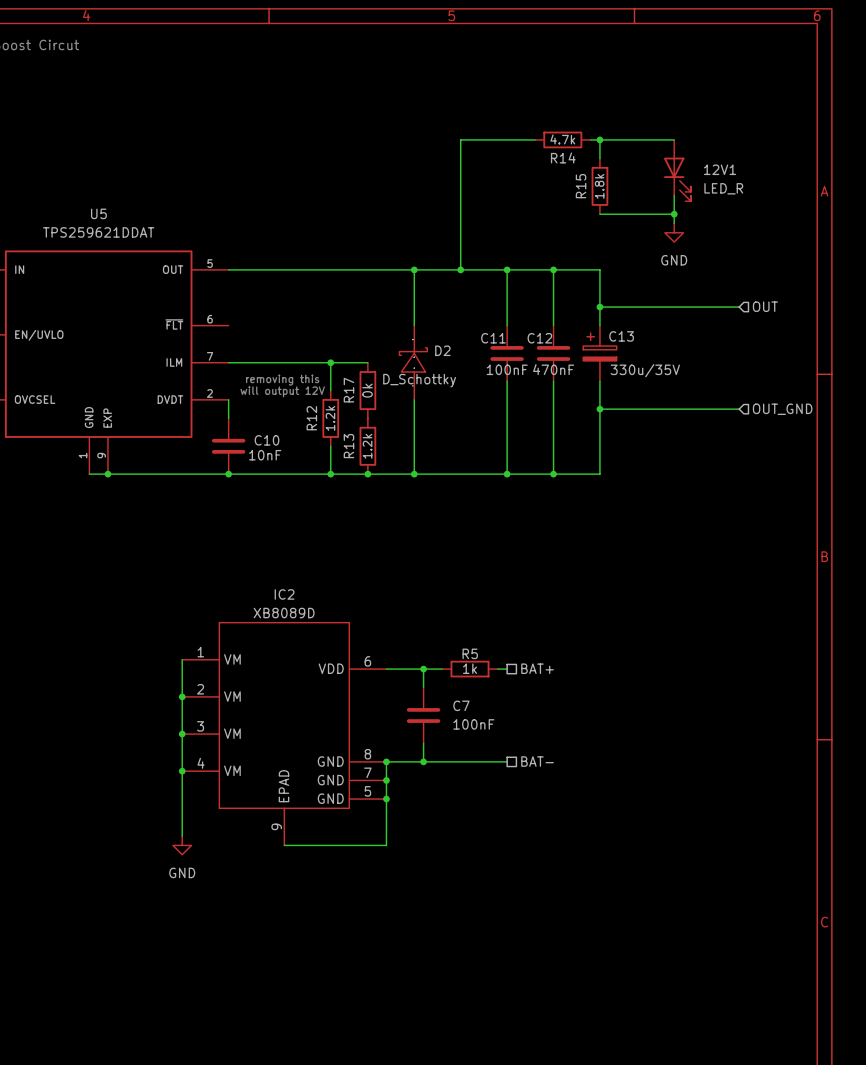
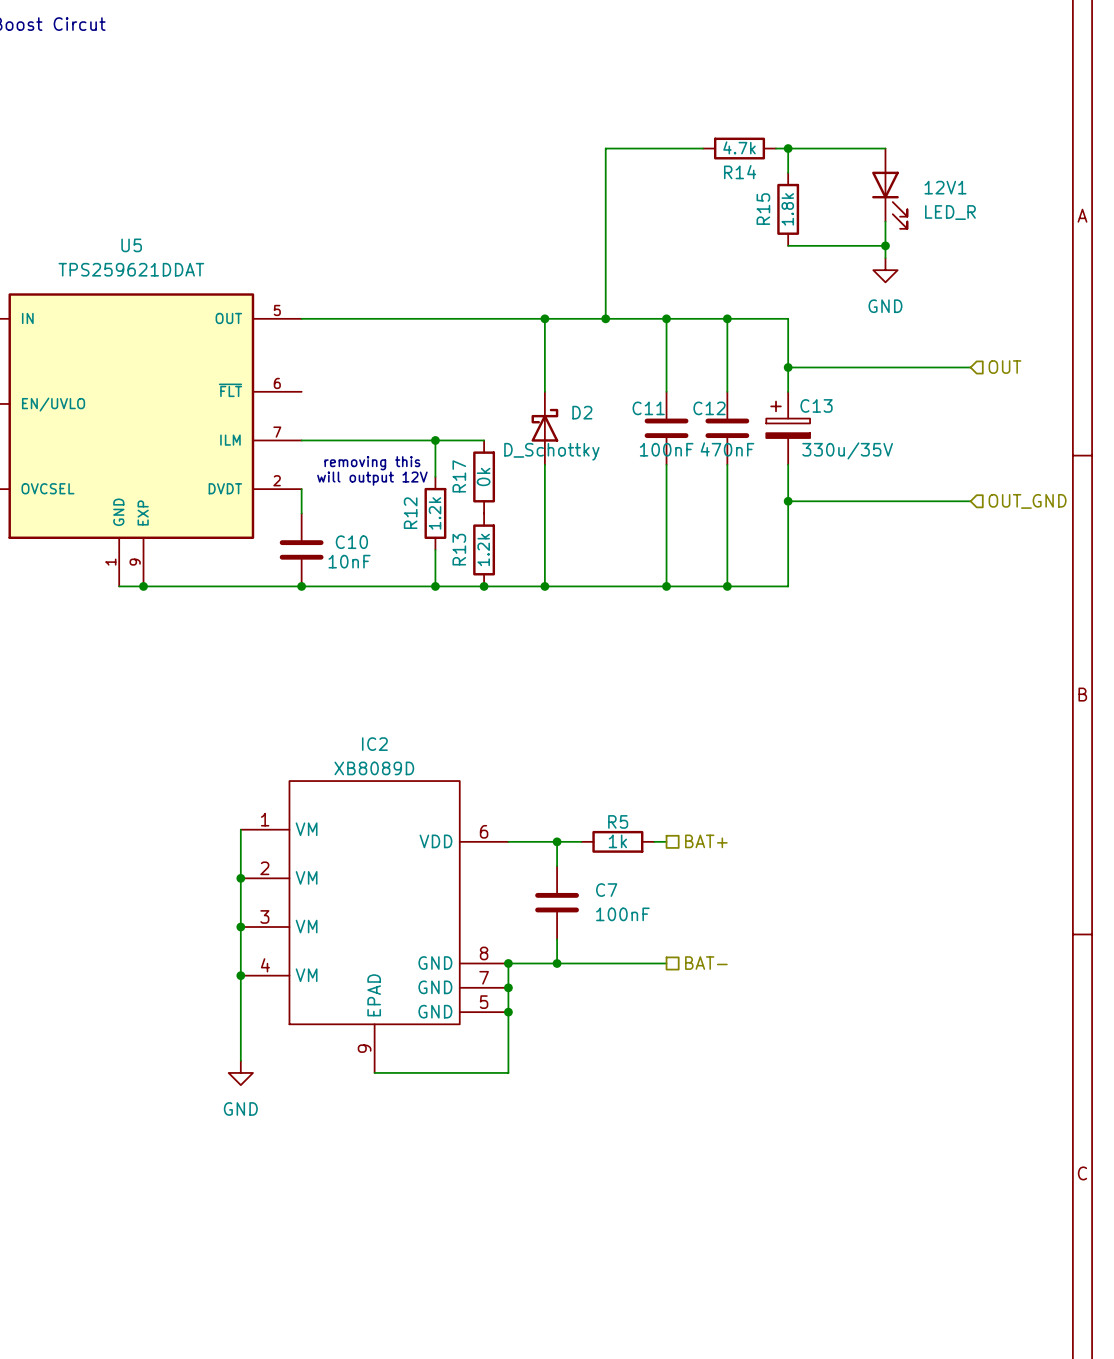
D2 symbol: [399, 325, 428, 400] -> [531, 391, 559, 465]

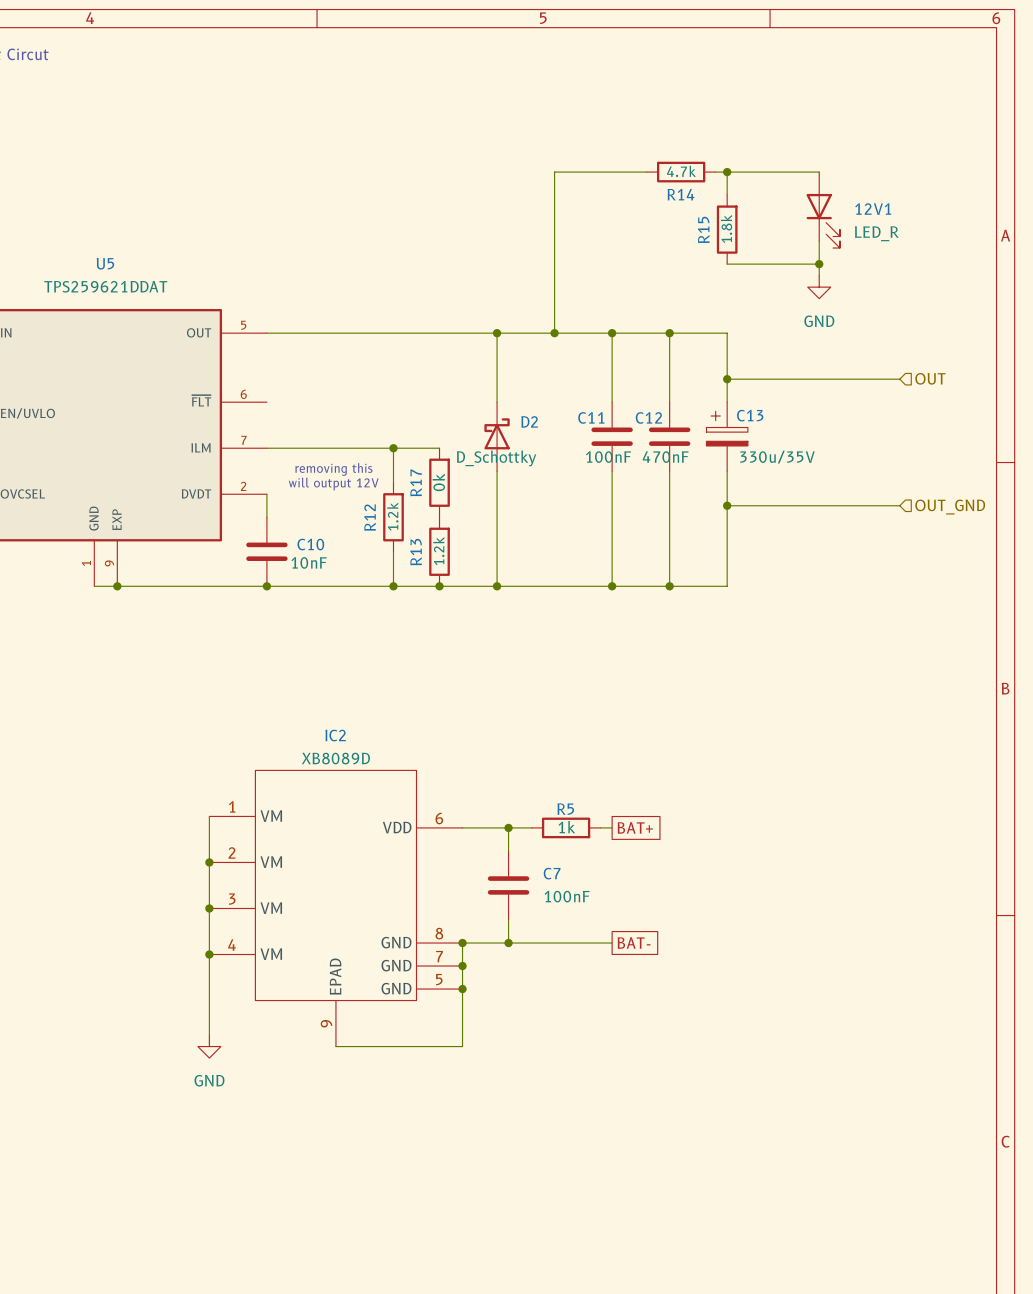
global label: none -> BAT+ (635, 827)
hierarchical label: BAT+ (706, 841) -> none
global label: none -> BAT- (634, 943)
hierarchical label: BAT- (706, 963) -> none

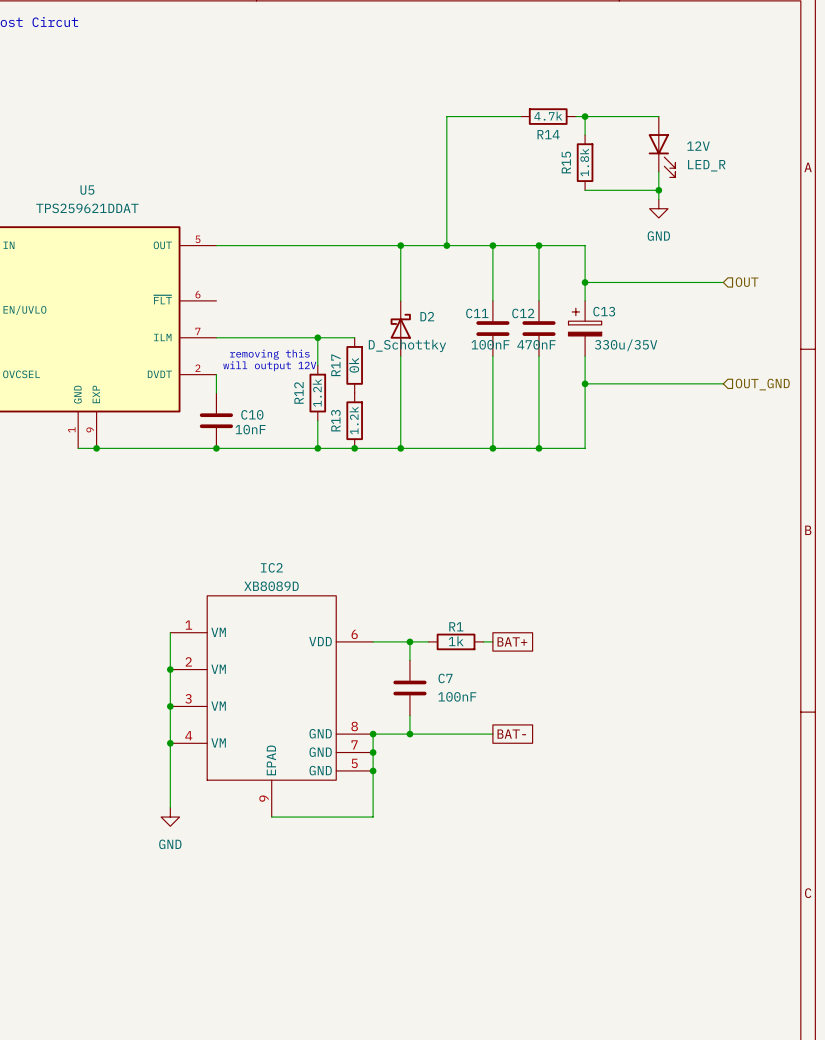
12V1 name: 12V1 (873, 209) -> 12V (698, 146)
R5 name: R5 (565, 809) -> R1 (456, 626)

